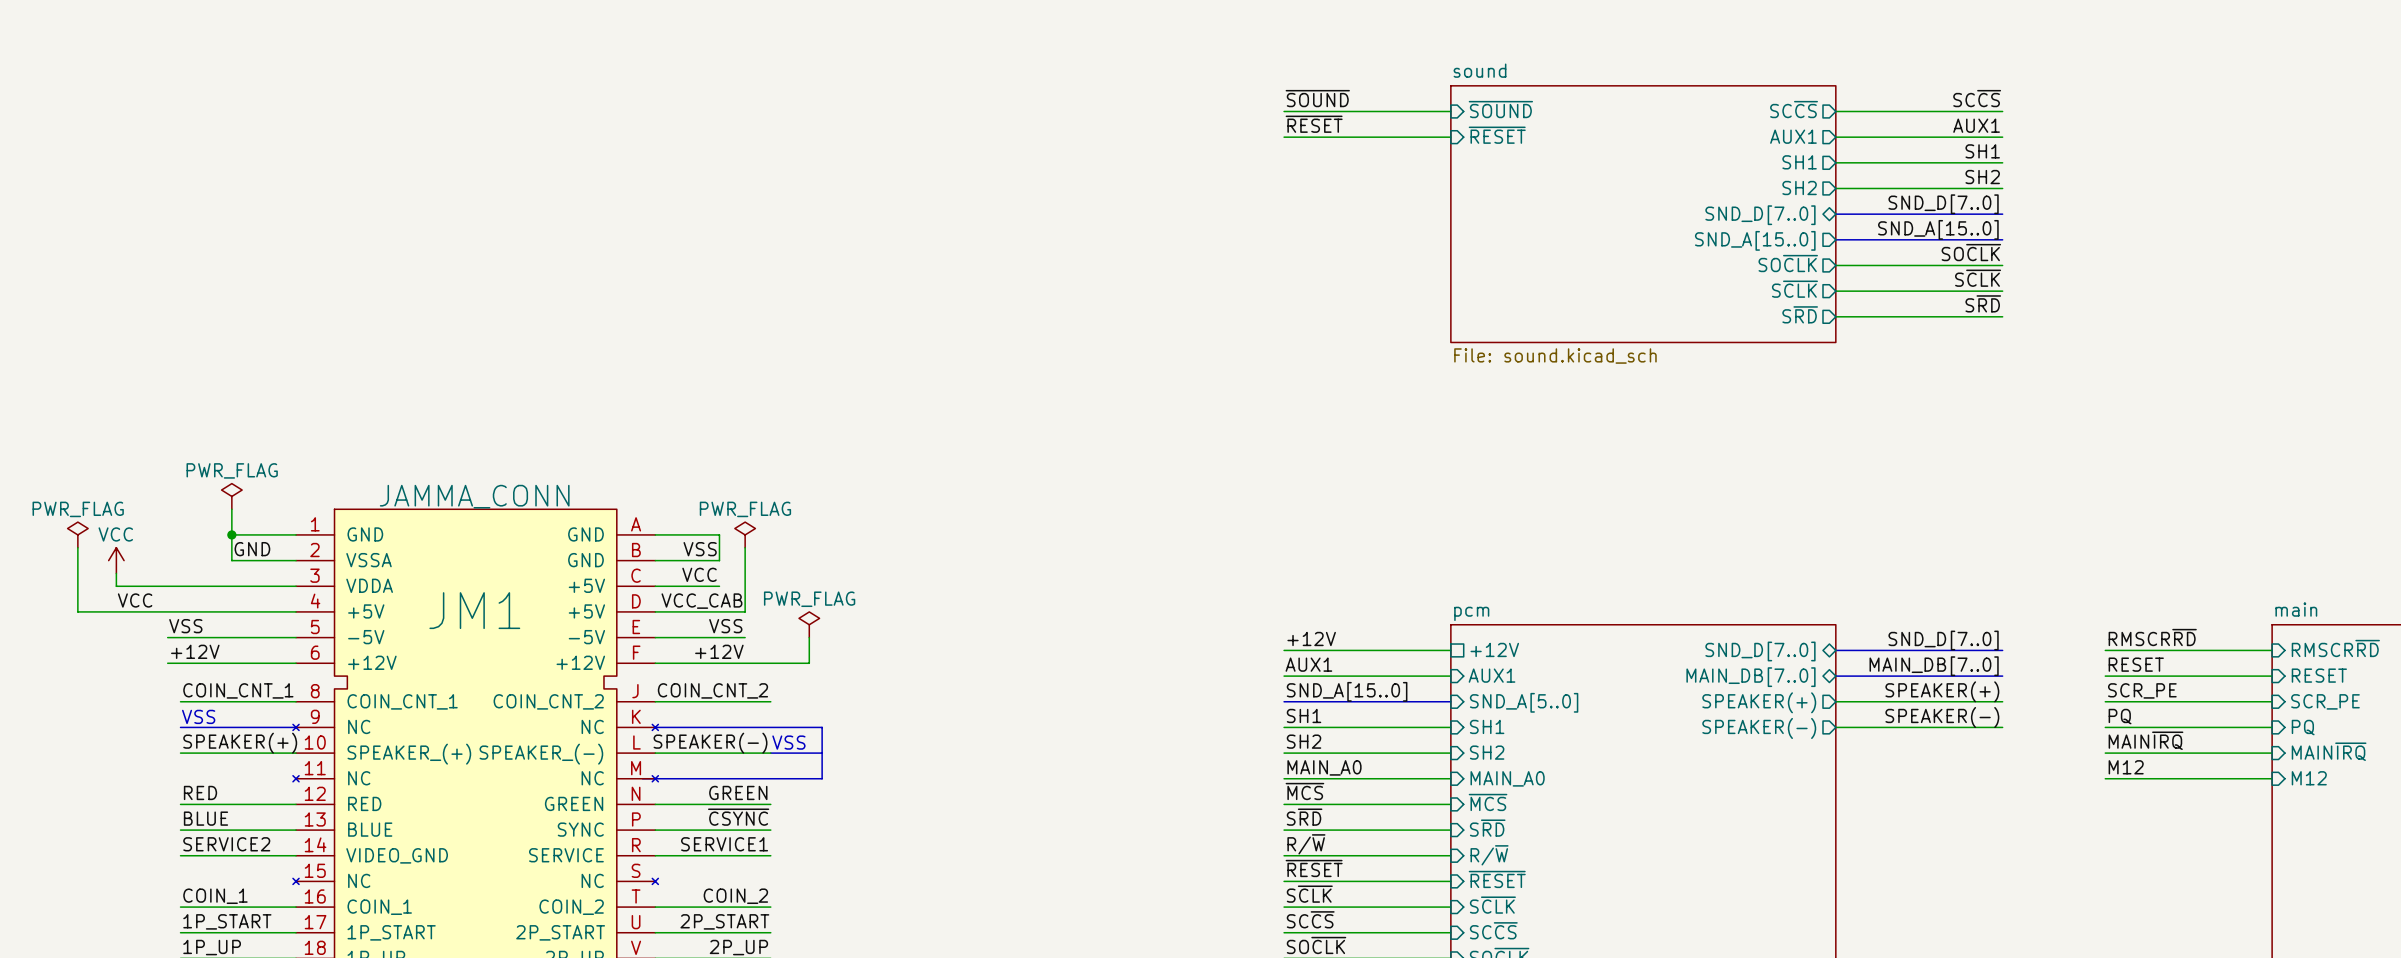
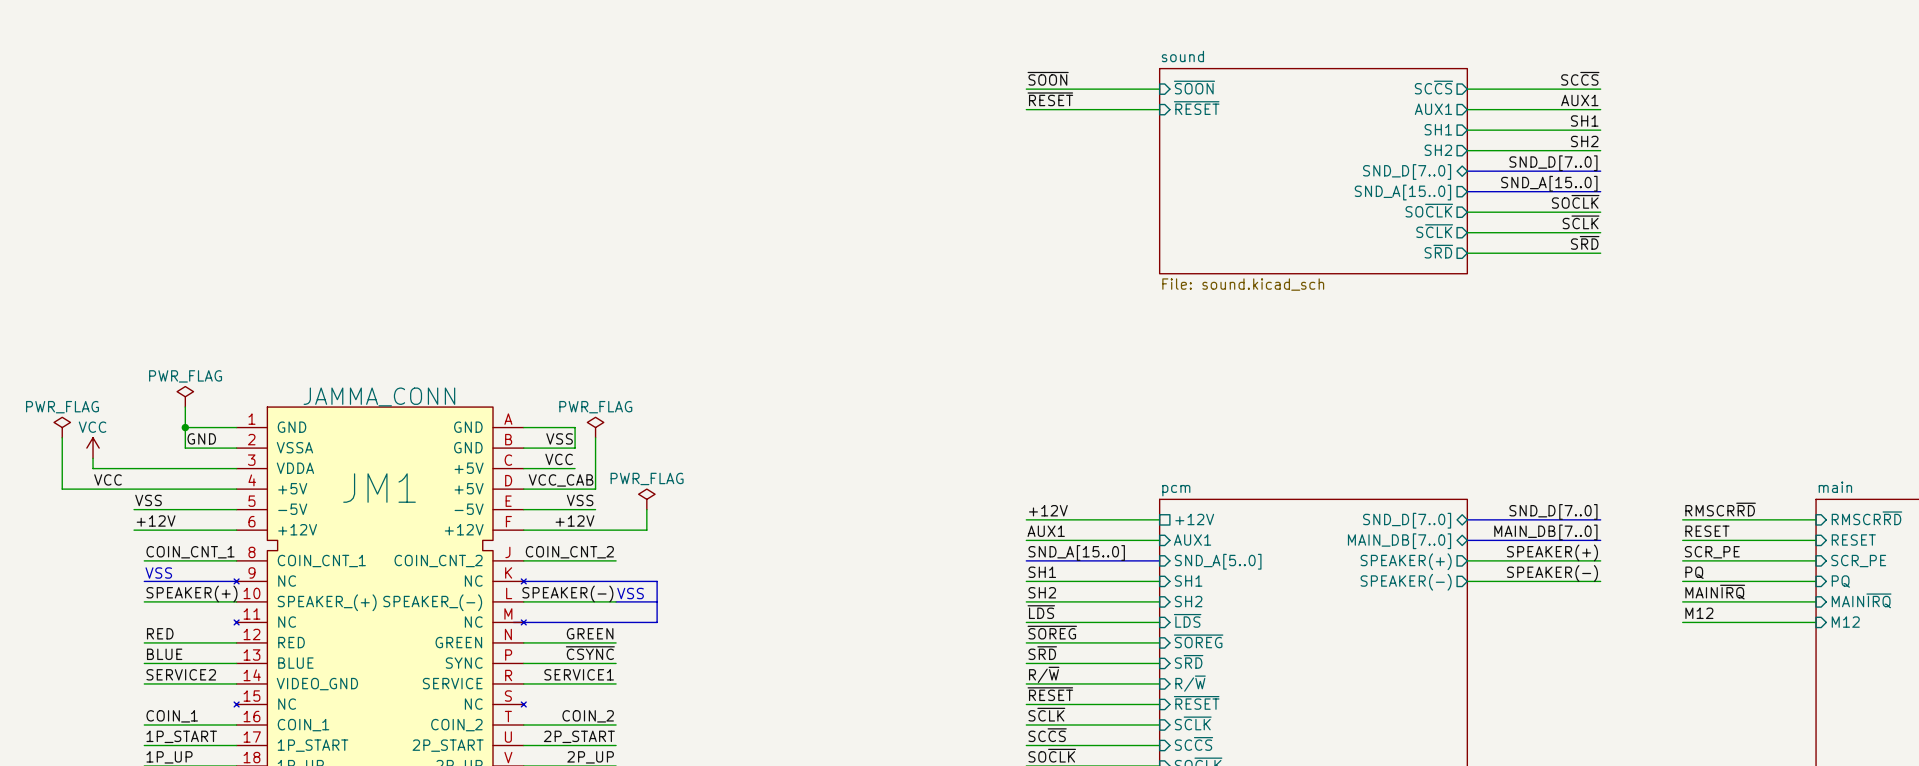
label: ~{SOUND} (1317, 98) -> ~{SOON} (1048, 78)
sheet pin: ~{SOUND} (1500, 109) -> ~{SOON} (1194, 87)
label: MAIN_A0 (1324, 767) -> ~{LDS} (1041, 612)
sheet pin: MAIN_A0 (1507, 778) -> ~{LDS} (1187, 620)
label: ~{MCS} (1304, 791) -> ~{SOREG} (1052, 632)
sheet pin: ~{MCS} (1488, 802) -> ~{SOREG} (1198, 641)

